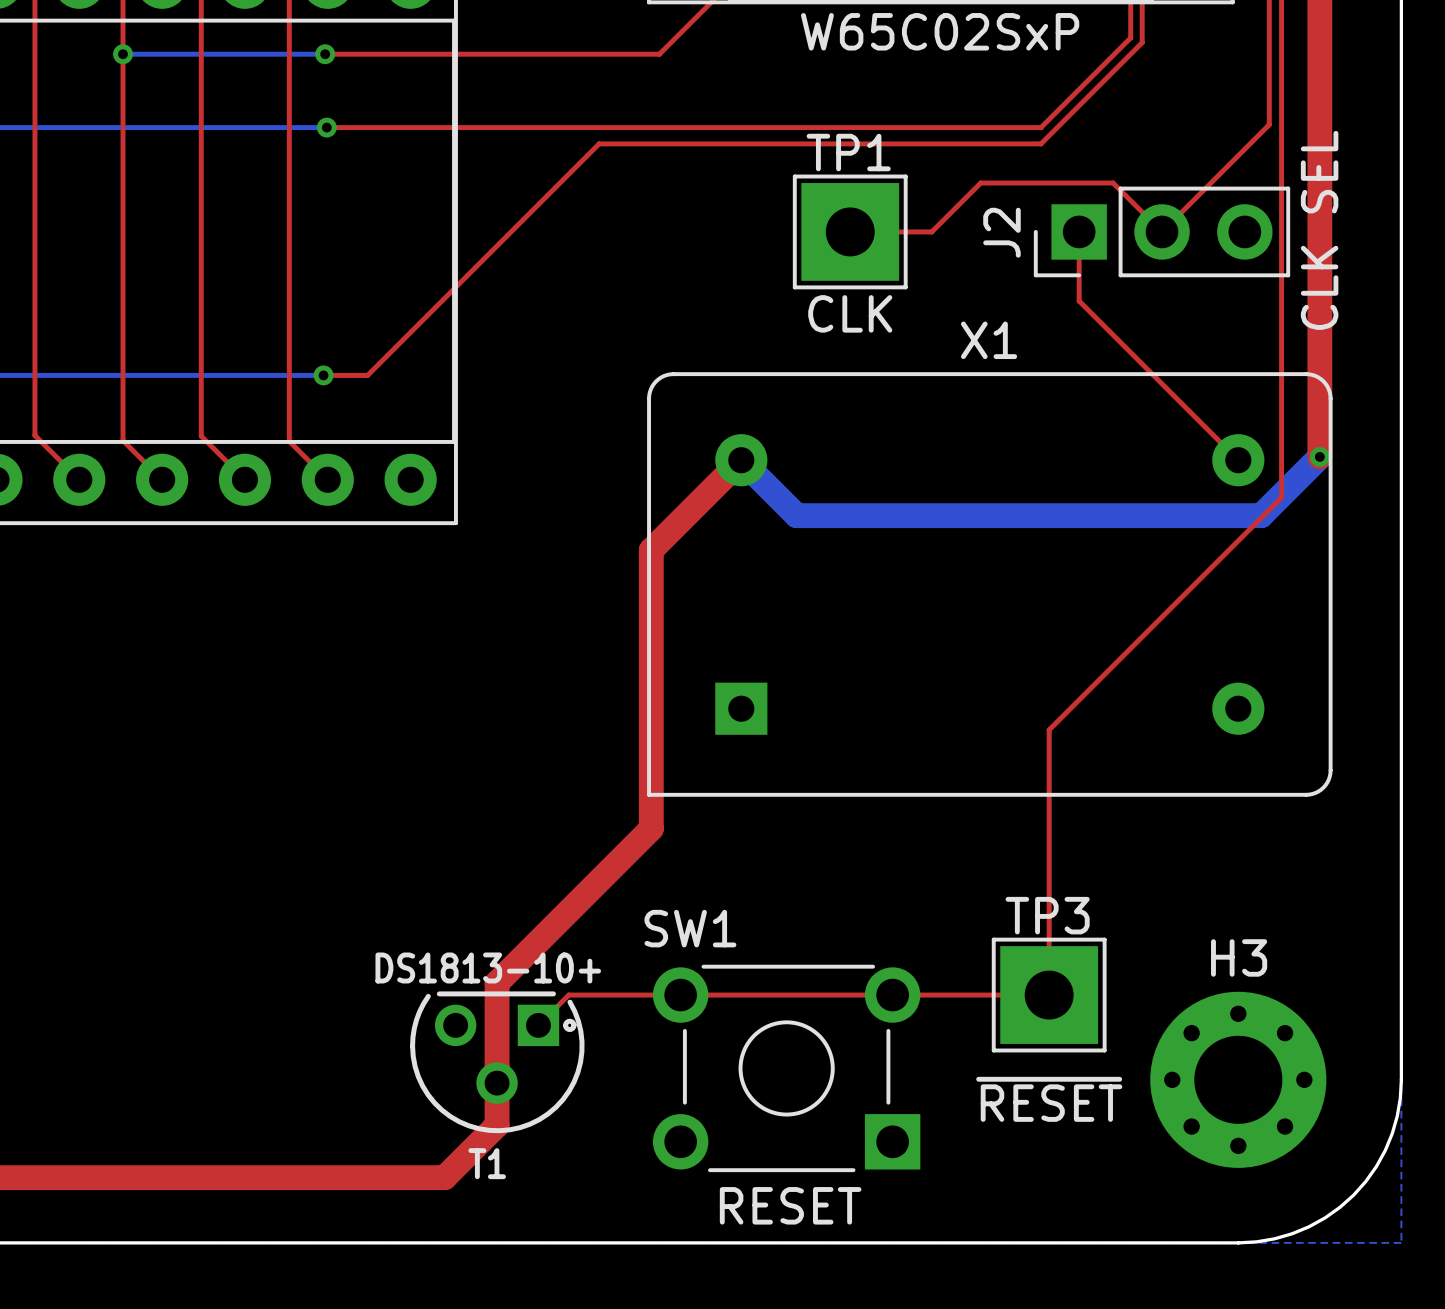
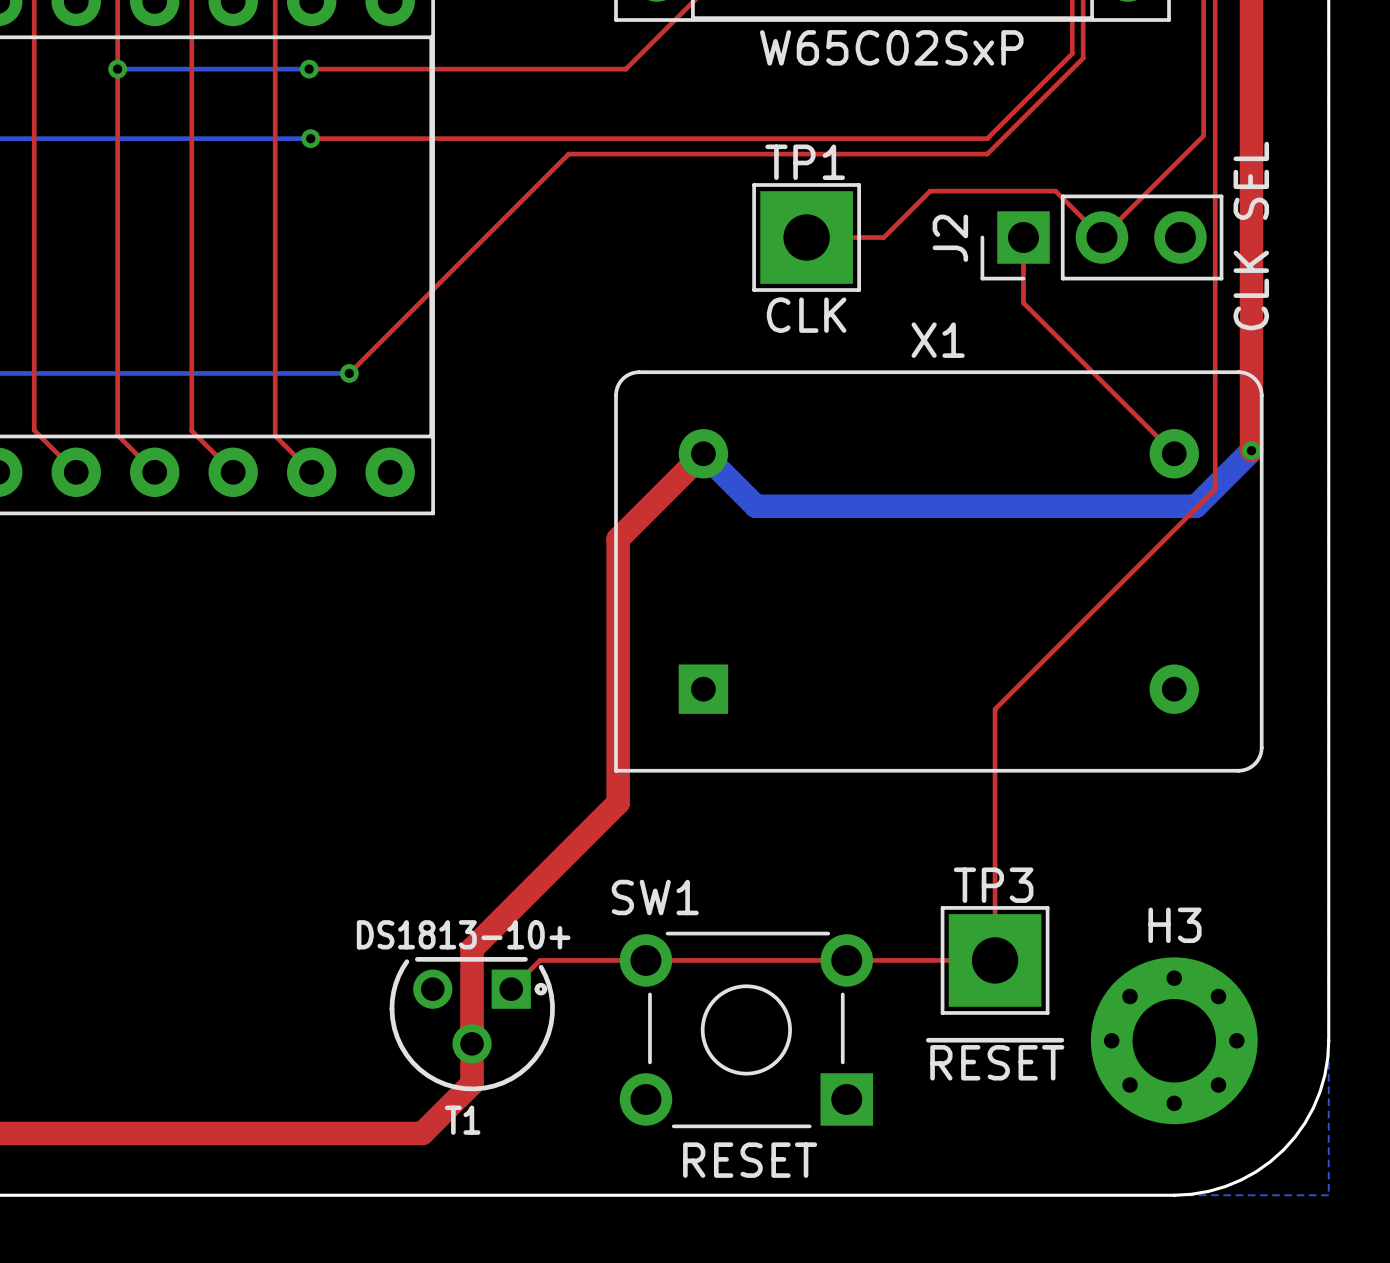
top track: (323, 375) (367, 375) -> none
bottom track: none -> (307, 373) (349, 373)
via position: (323, 375) -> (349, 373)

